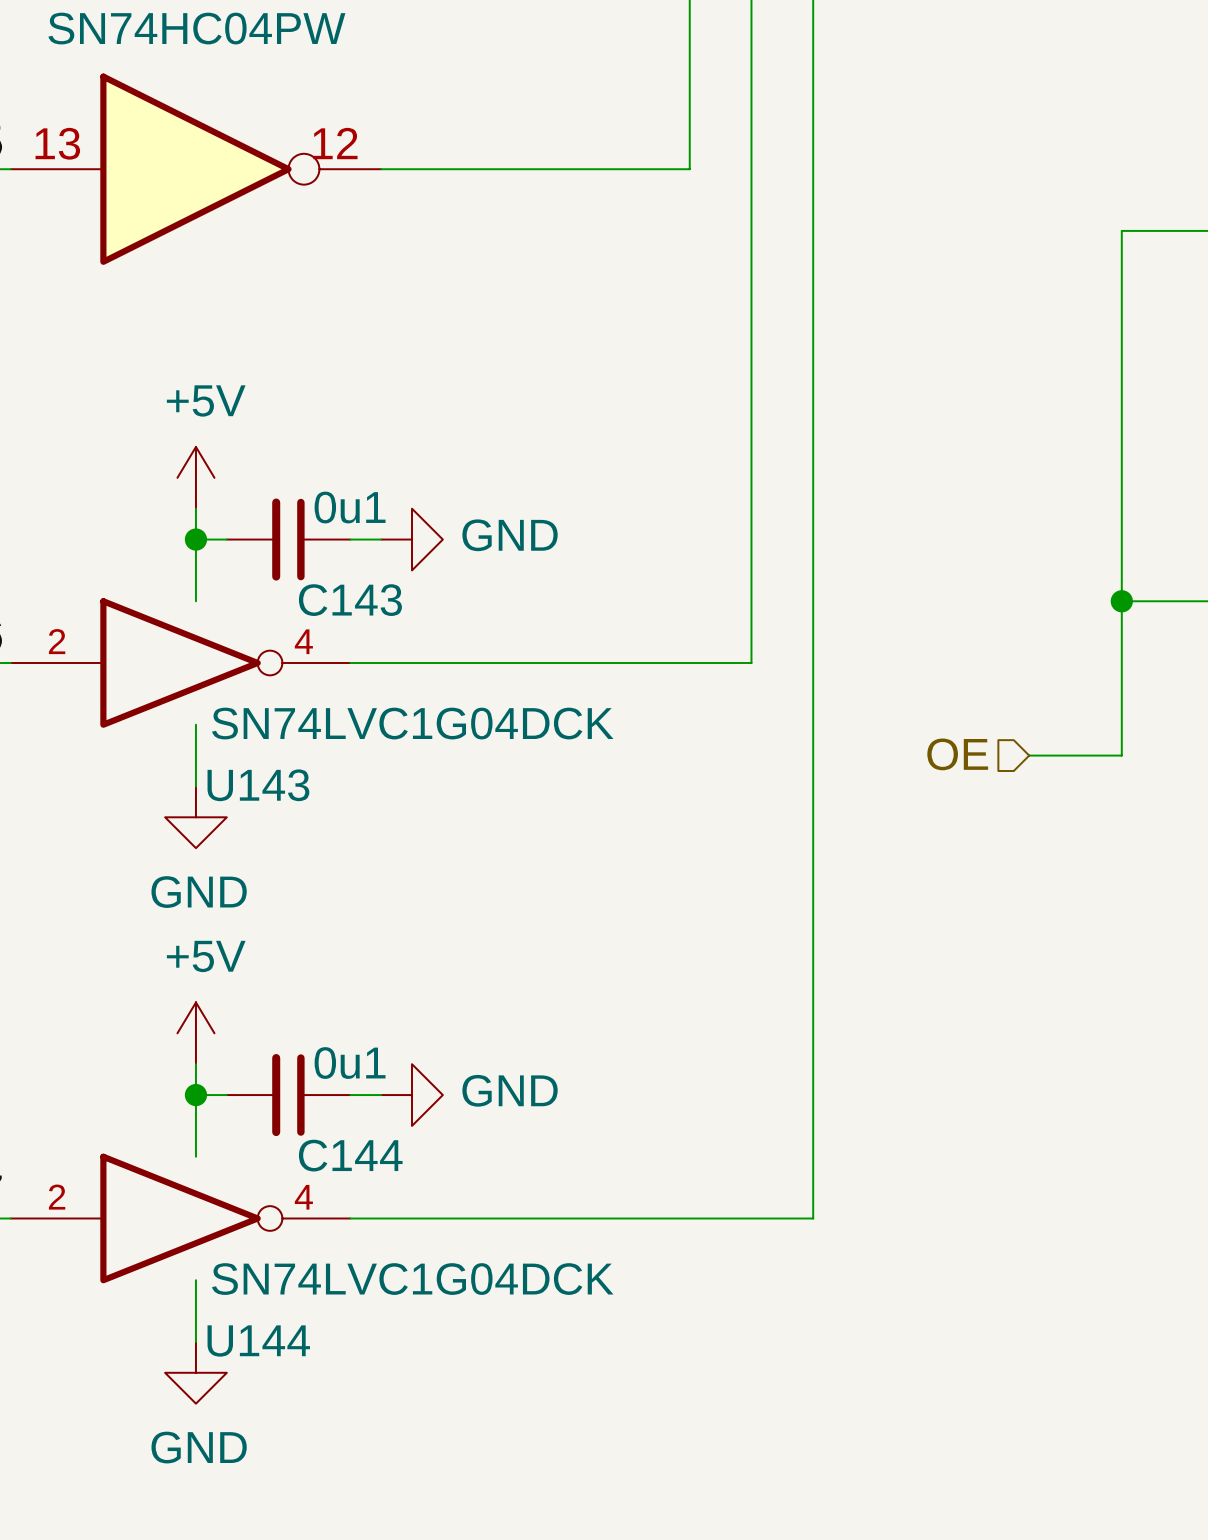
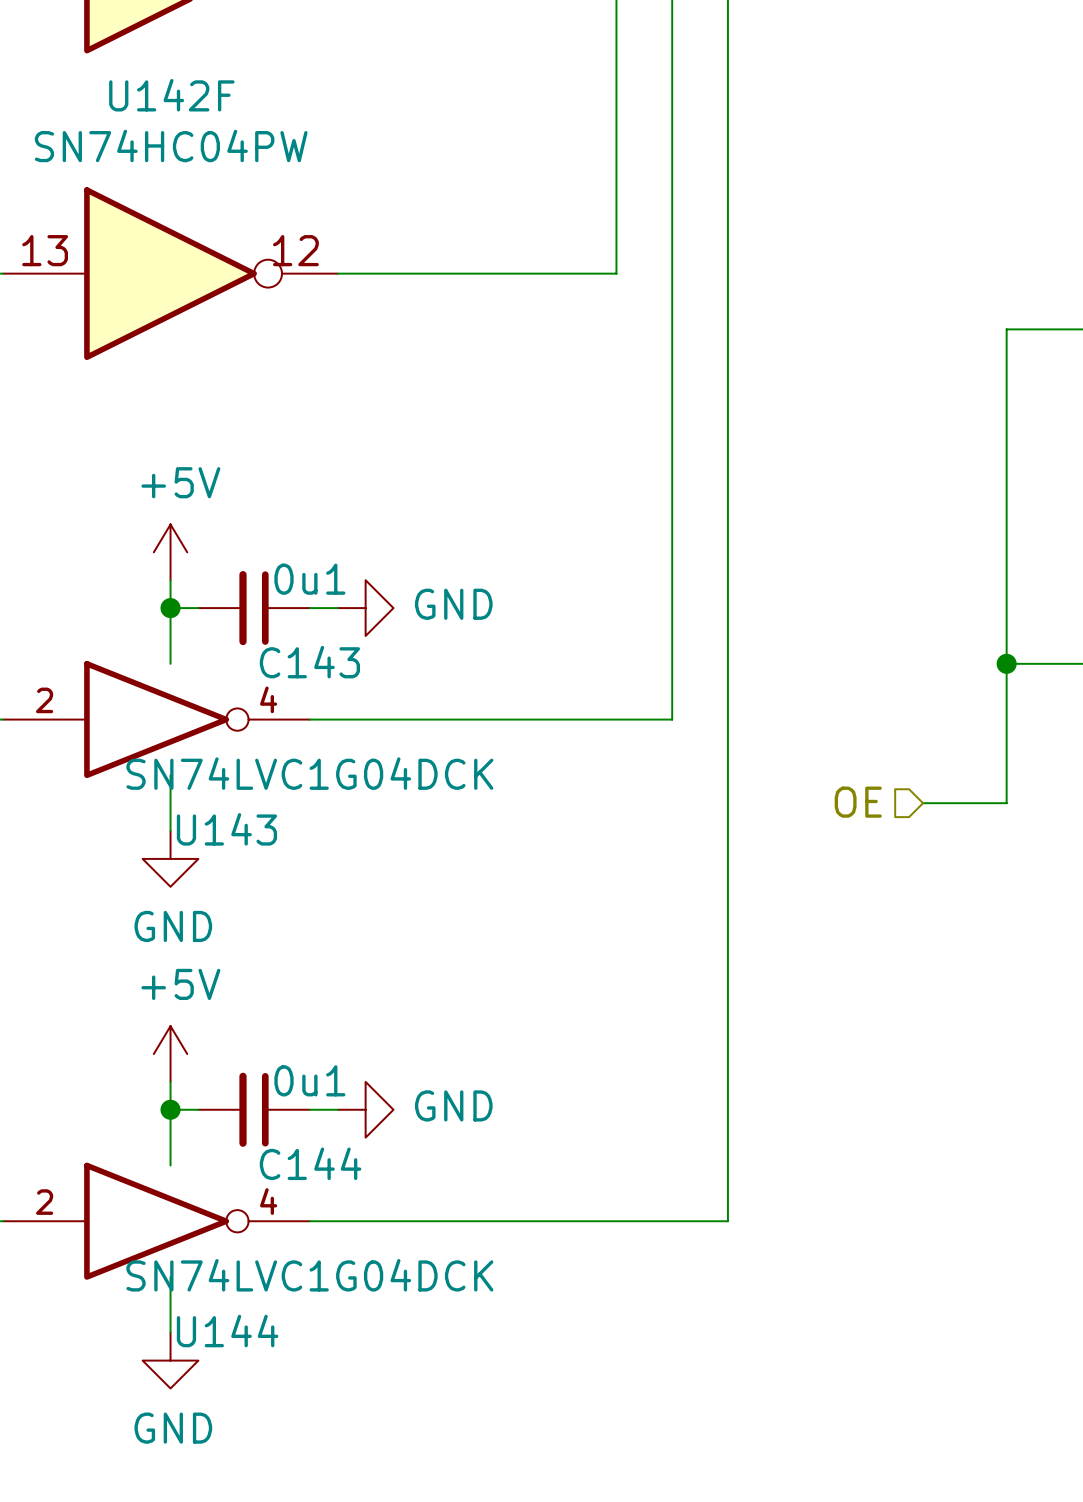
U143 value position: SN74LVC1G04DCK (412, 723) -> SN74LVC1G04DCK (309, 773)
U144 value position: SN74LVC1G04DCK (412, 1279) -> SN74LVC1G04DCK (309, 1275)

